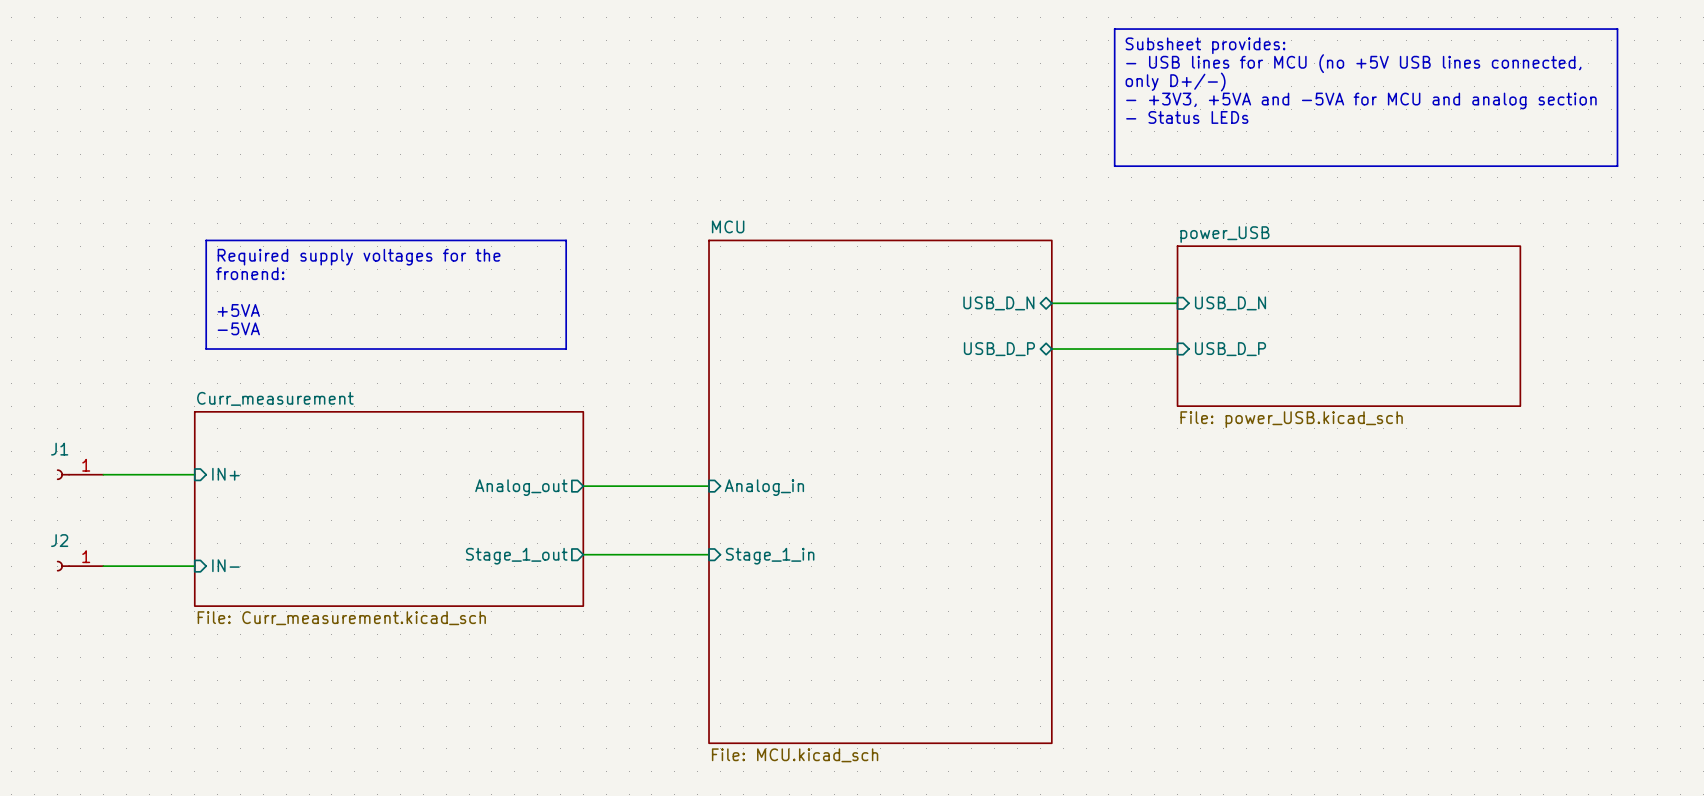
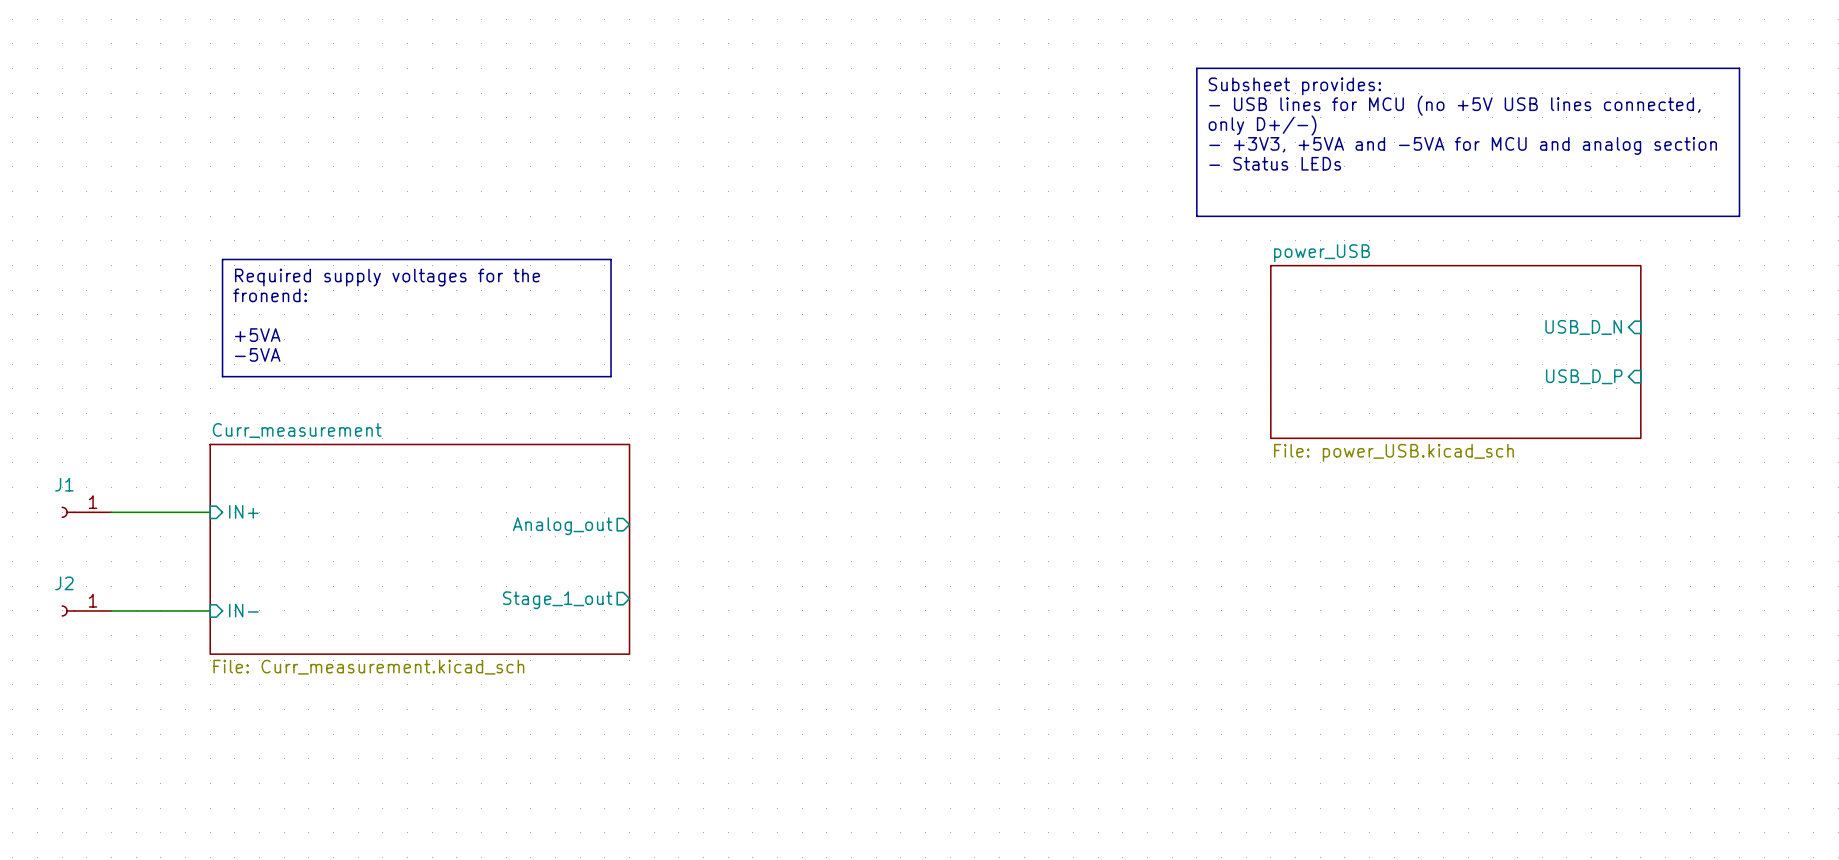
line: (1114, 29) (1617, 29) (1617, 166) (1114, 166) (1114, 29) -> (1196, 68) (1739, 68) (1739, 216) (1196, 216) (1196, 68)
text position: Subsheet provides: (1205, 45) -> Subsheet provides: (1294, 86)
text position: - USB lines for MCU (no +5V USB lines connected, (1353, 63) -> - USB lines for MCU (no +5V USB lines connected, (1454, 105)
text position: only D+/-) (1175, 82) -> only D+/-) (1262, 125)
text position: - +3V3, +5VA and -5VA for MCU and analog section (1361, 100) -> - +3V3, +5VA and -5VA for MCU and analog section (1463, 145)
text position: - Status LEDs (1187, 117) -> - Status LEDs (1275, 163)
sheet pin: USB_D_N (998, 303) -> none
wire: (1051, 303) (1177, 303) -> none
sheet pin: USB_D_N (1230, 303) -> none
sheet pin: none -> USB_D_N (1583, 327)
sheet pin: USB_D_P (999, 349) -> none
wire: (1051, 349) (1177, 349) -> none
sheet pin: USB_D_P (1230, 349) -> none
sheet pin: none -> USB_D_P (1584, 376)
wire: (583, 486) (709, 486) -> none
sheet pin: Analog_in (764, 487) -> none
sheet MCU: File: MCU.kicad_sch (880, 491) -> none
wire: (583, 554) (709, 554) -> none
sheet pin: Stage_1_in (770, 556) -> none

